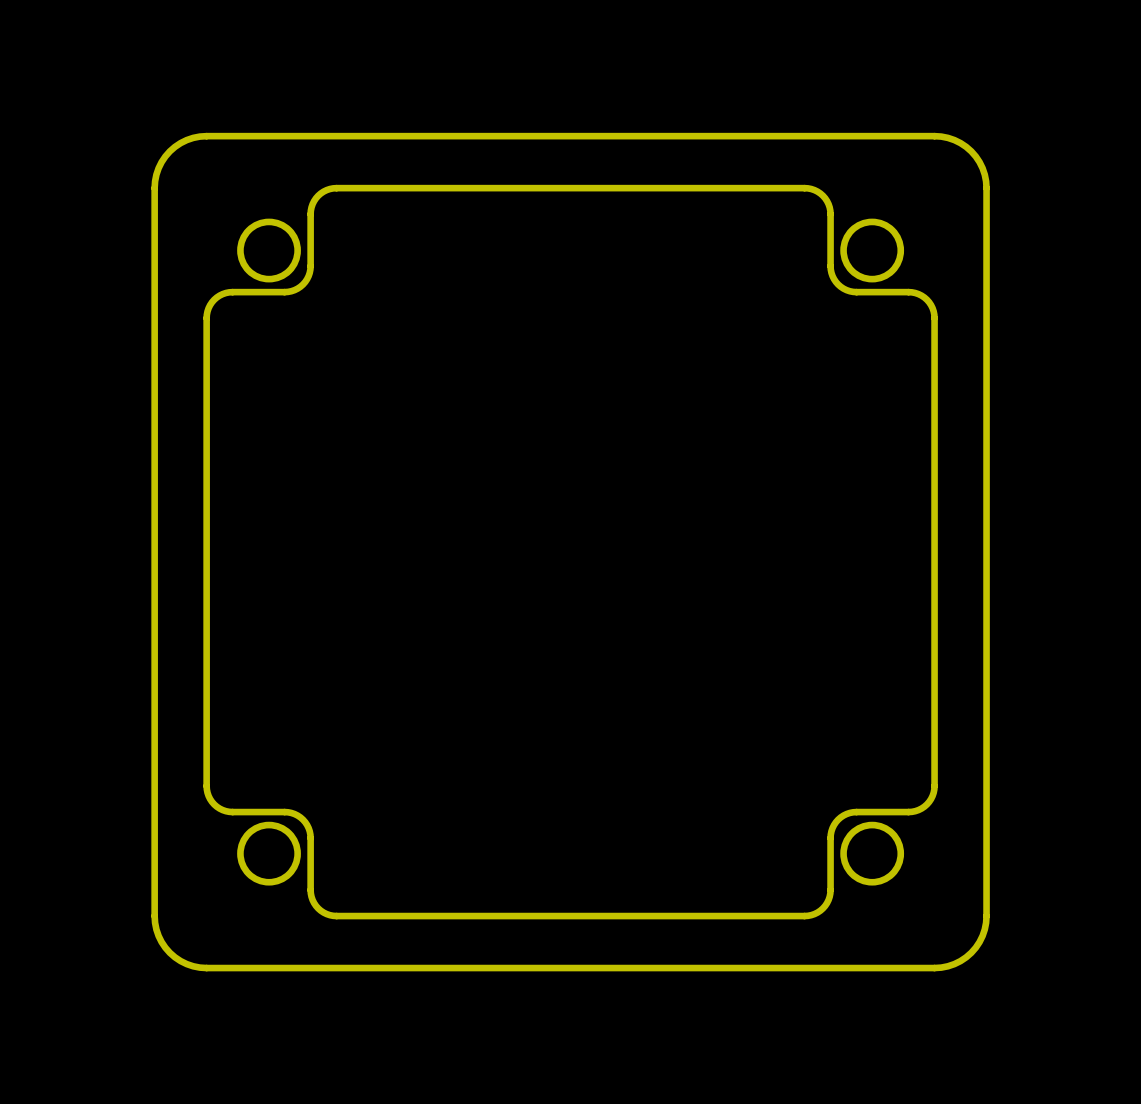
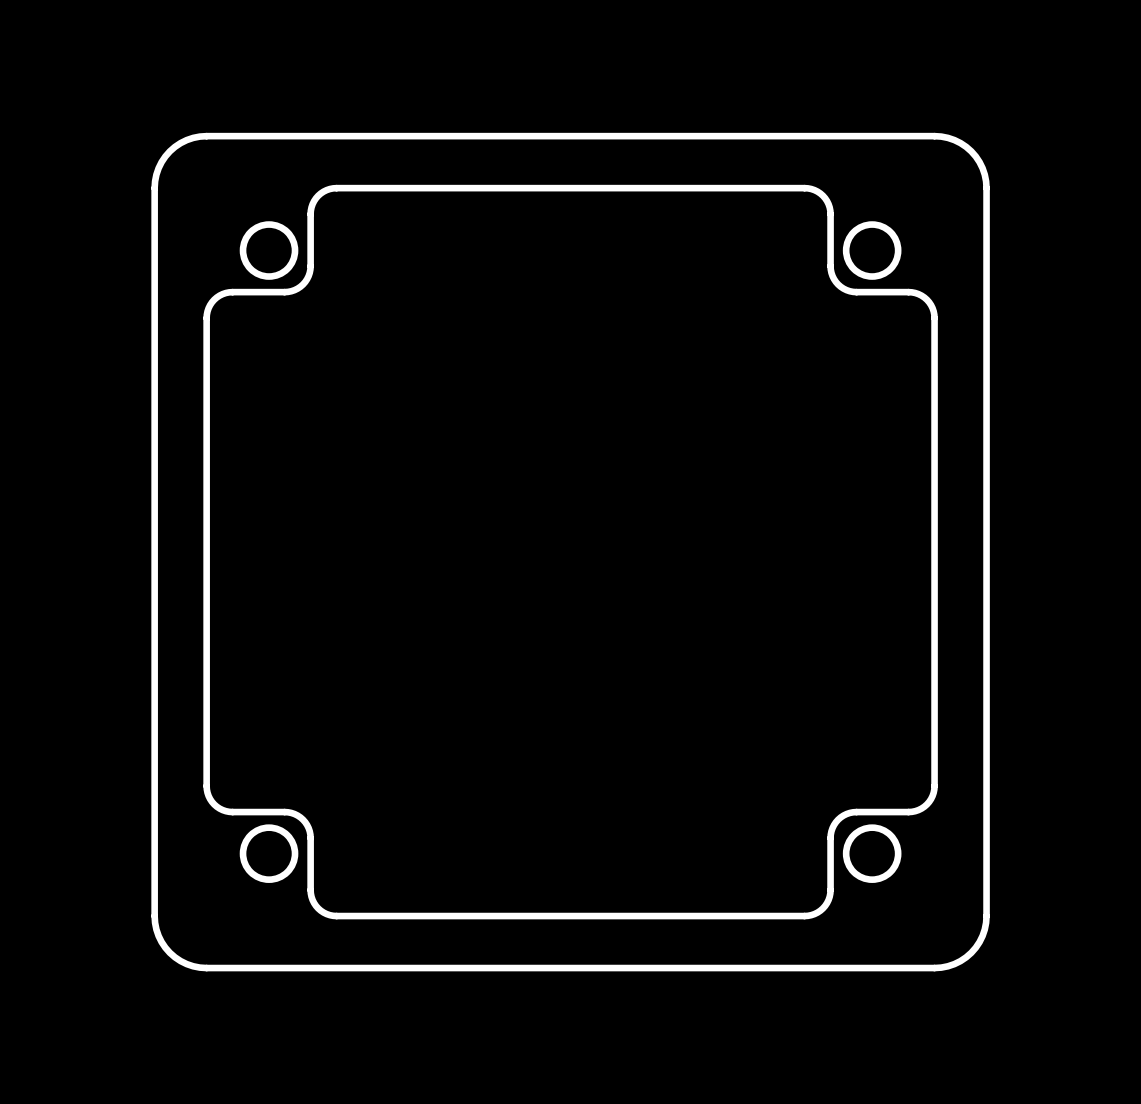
round board edge: [237, 218, 301, 283] -> none
round board edge: [840, 218, 905, 283] -> none
round board edge: none -> [239, 221, 299, 280]
round board edge: none -> [842, 221, 902, 280]
round board edge: [237, 821, 301, 886] -> none
round board edge: [840, 821, 905, 886] -> none
round board edge: none -> [239, 824, 299, 883]
round board edge: none -> [842, 824, 902, 883]

